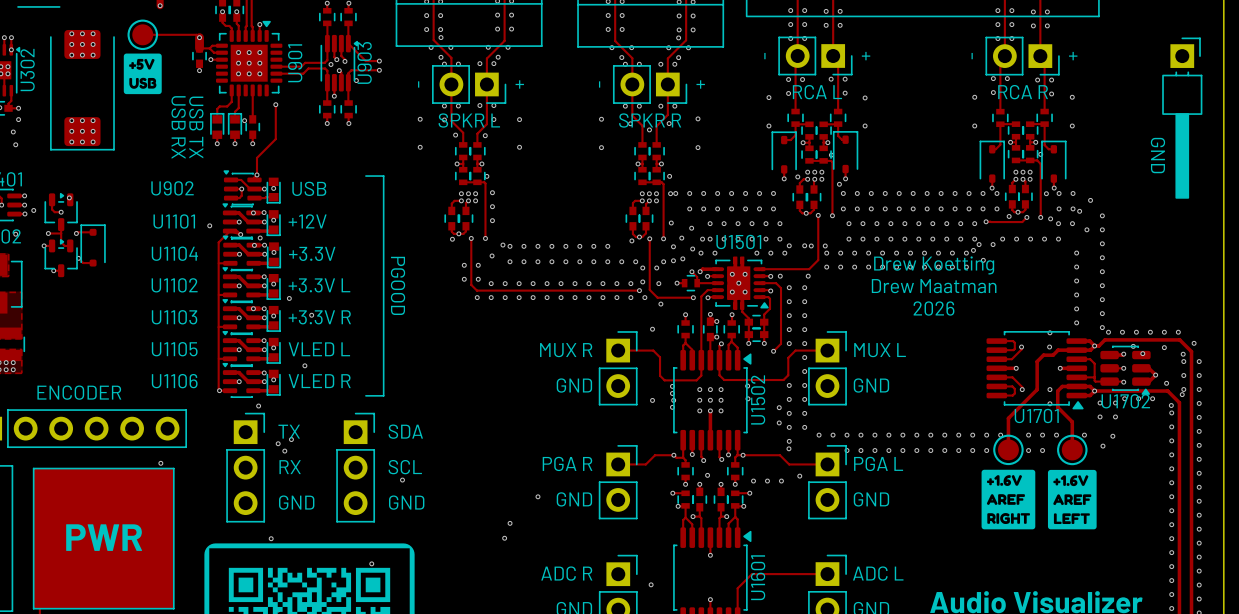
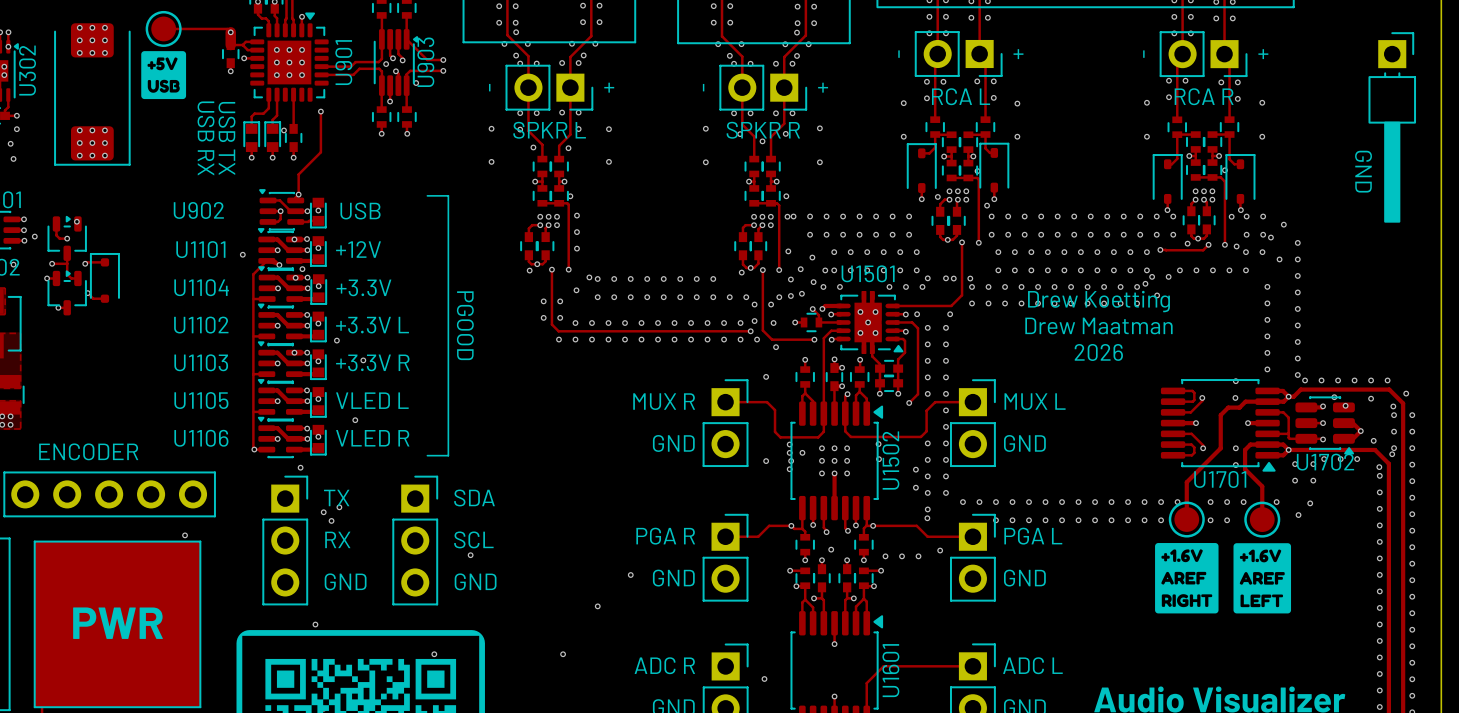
via: none -> (802, 452)
via position: (504, 538) -> (563, 654)

